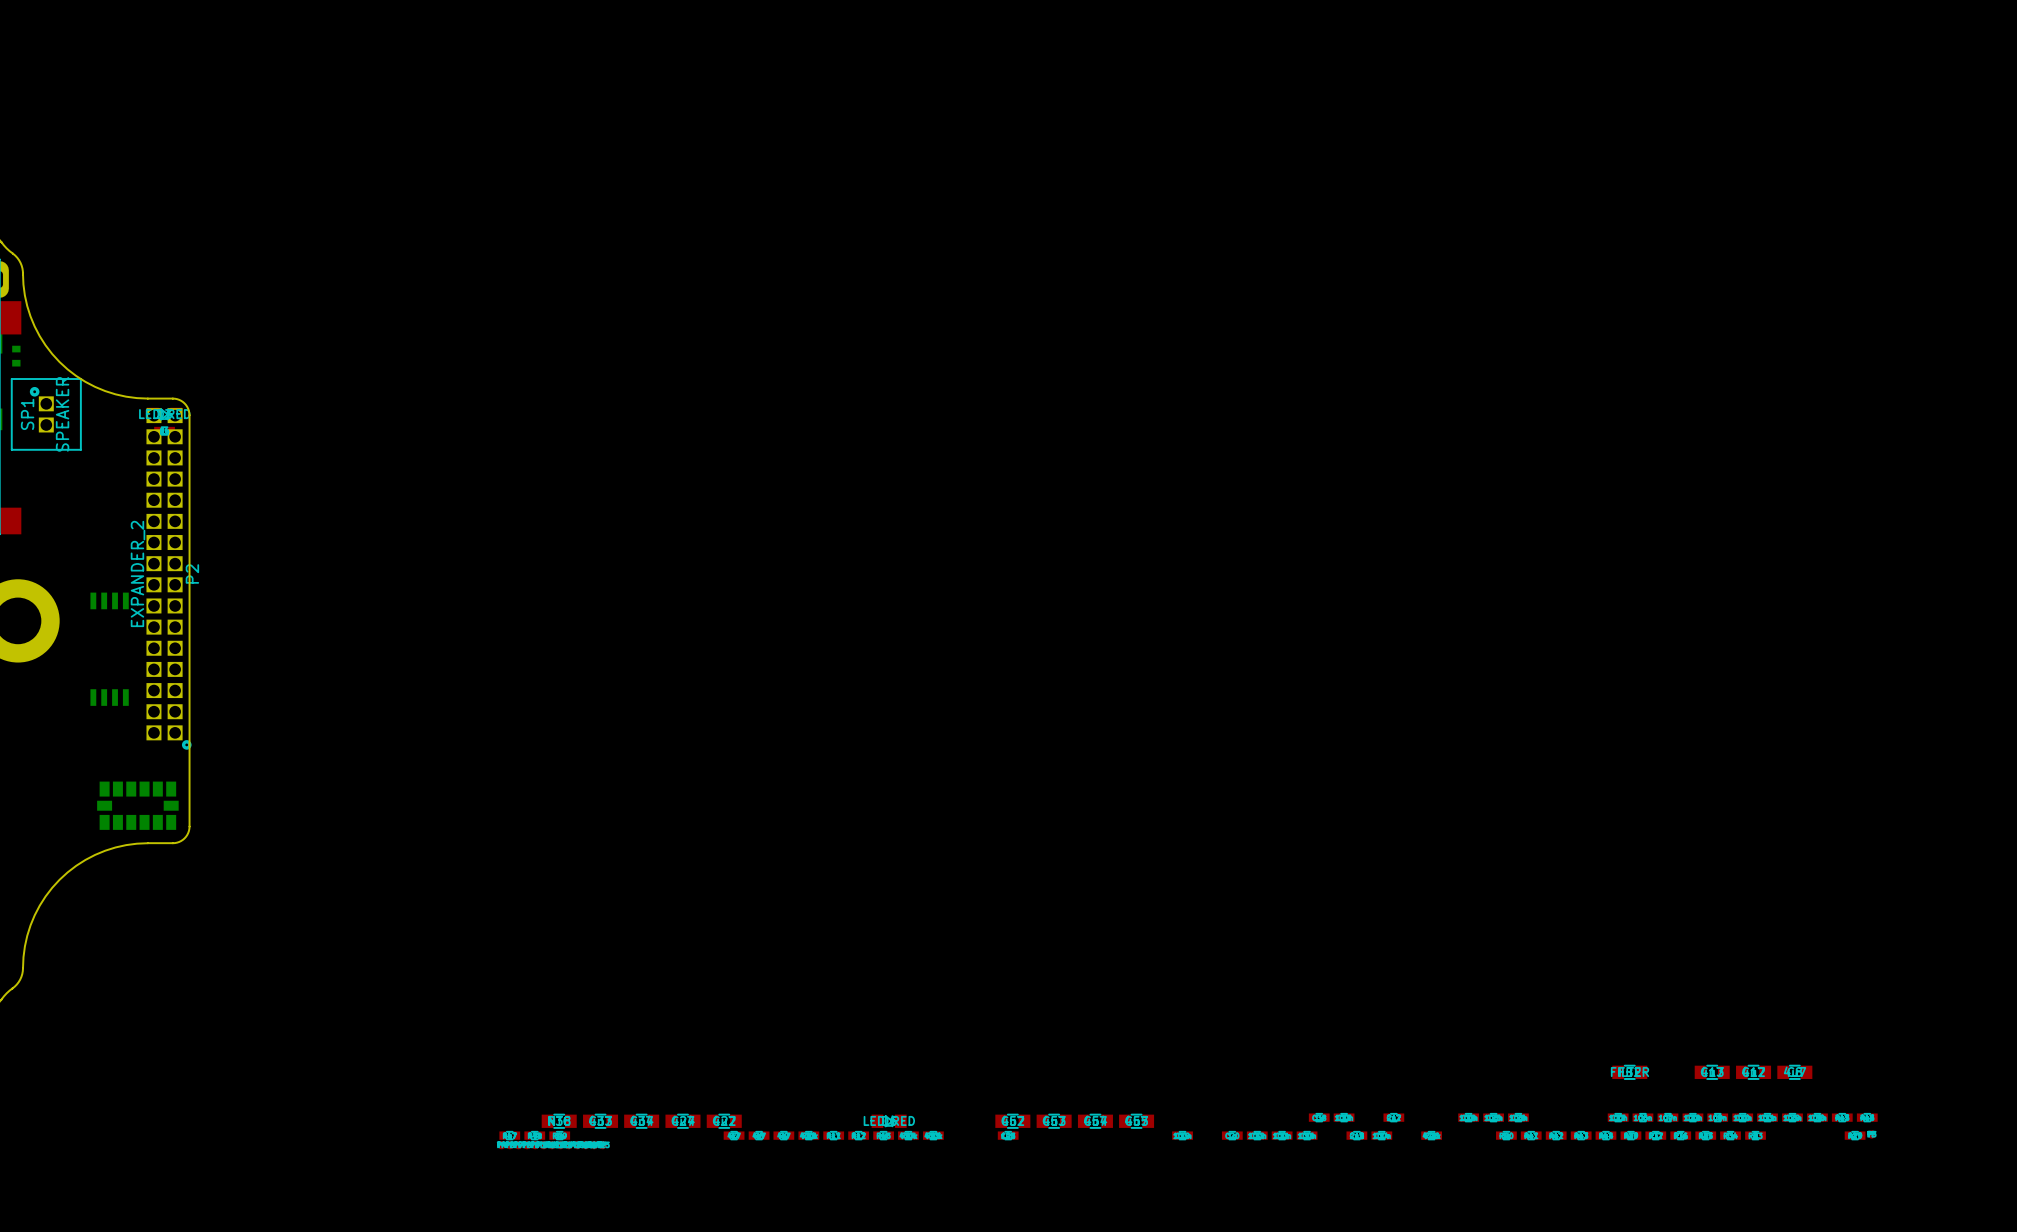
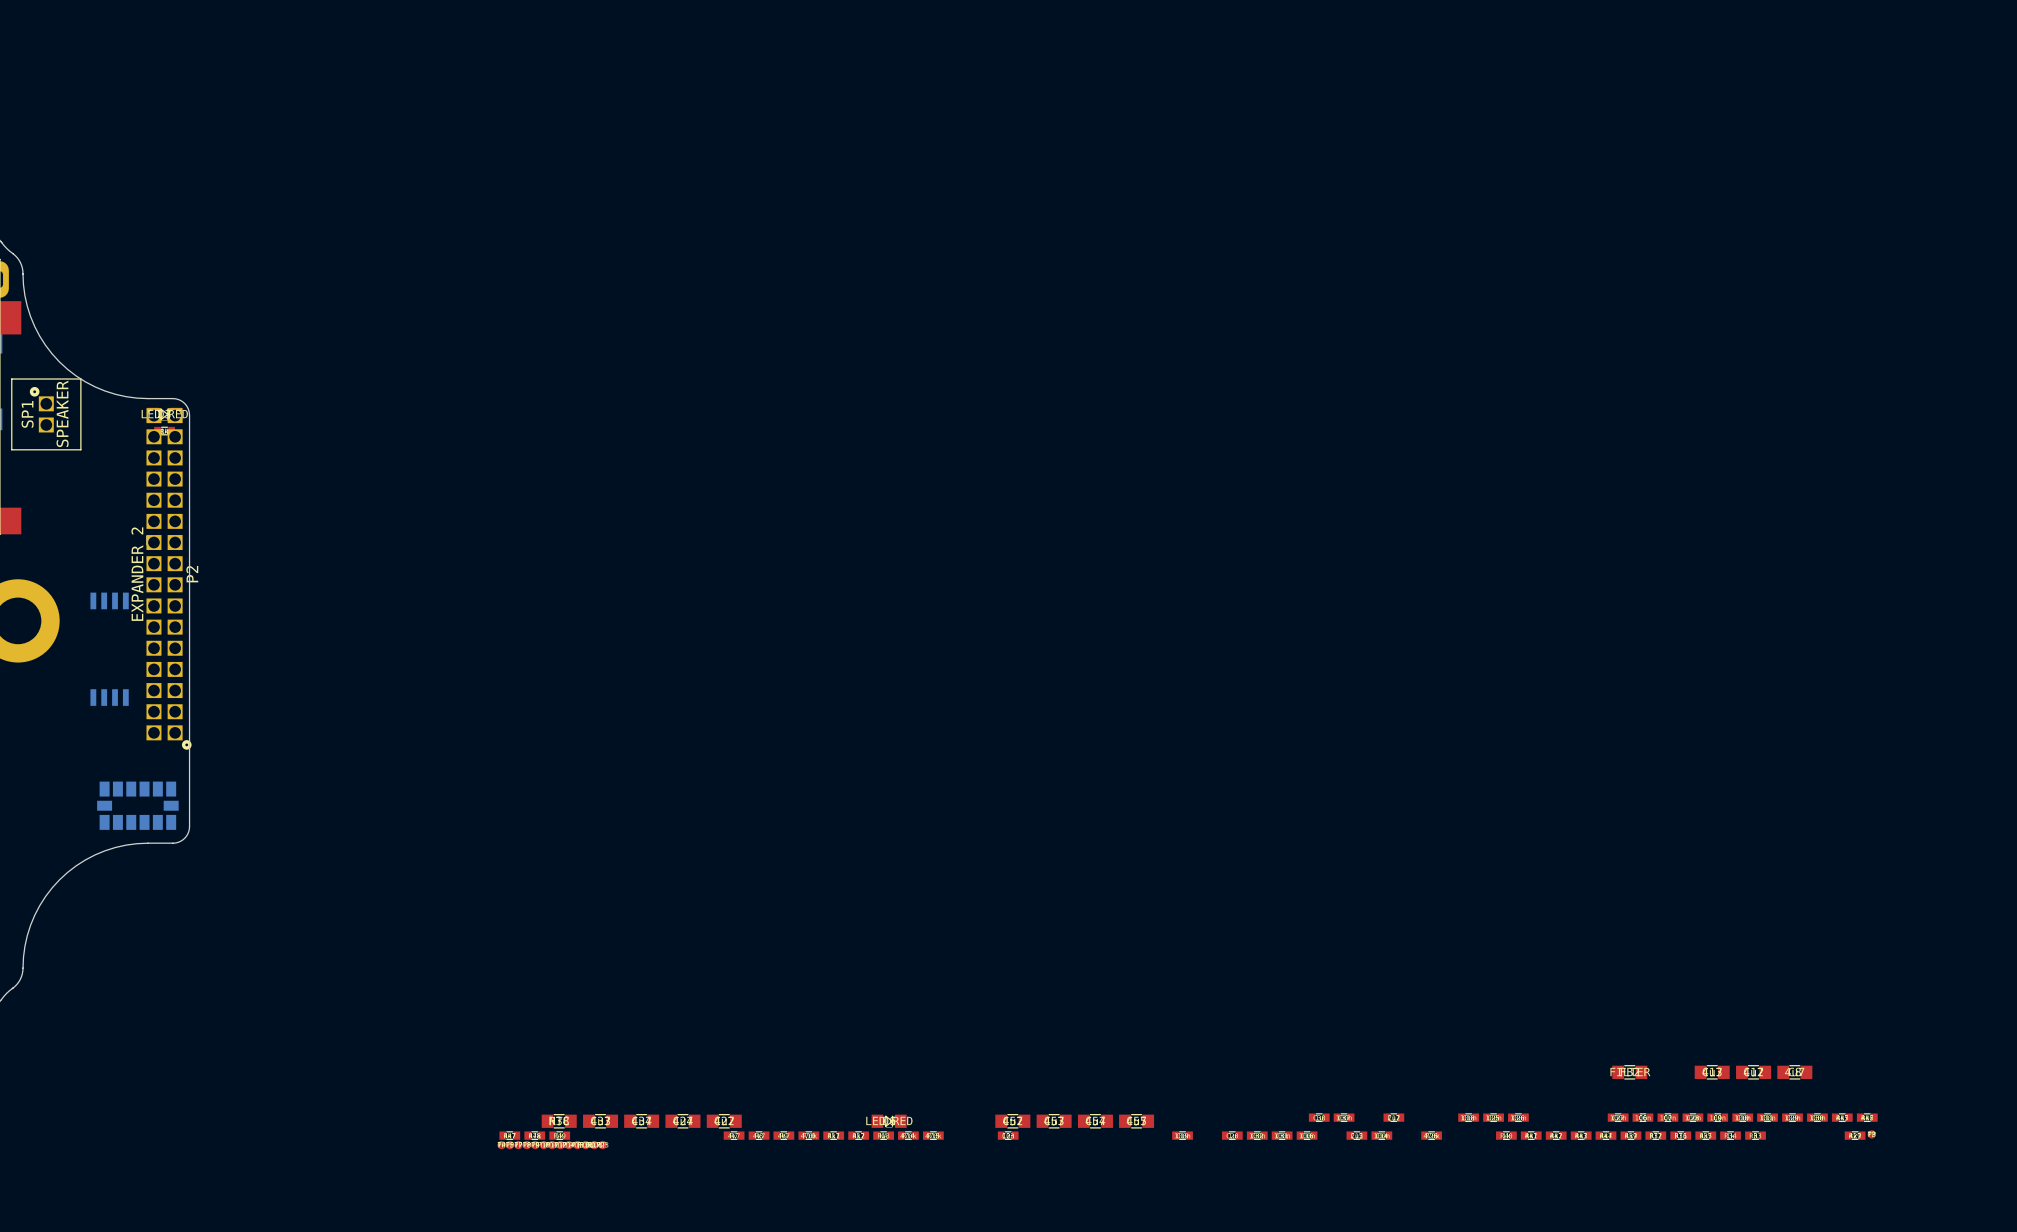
part: (16, 356) -> none

